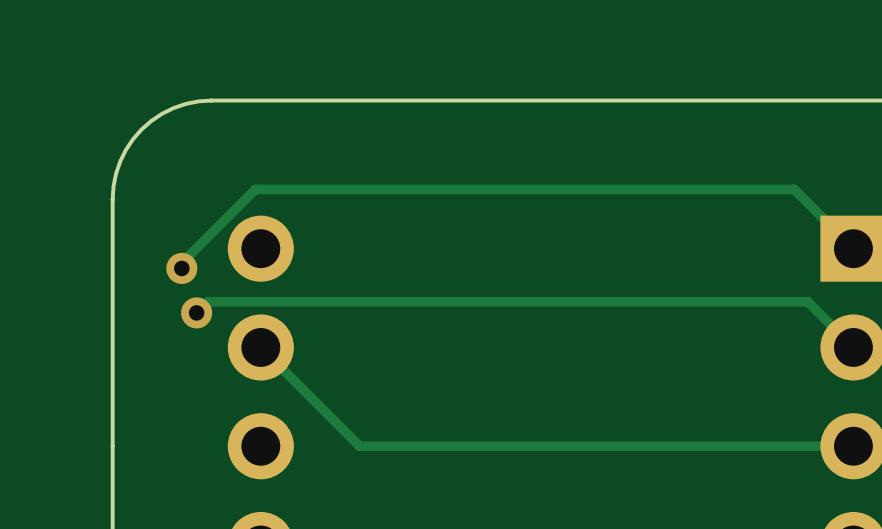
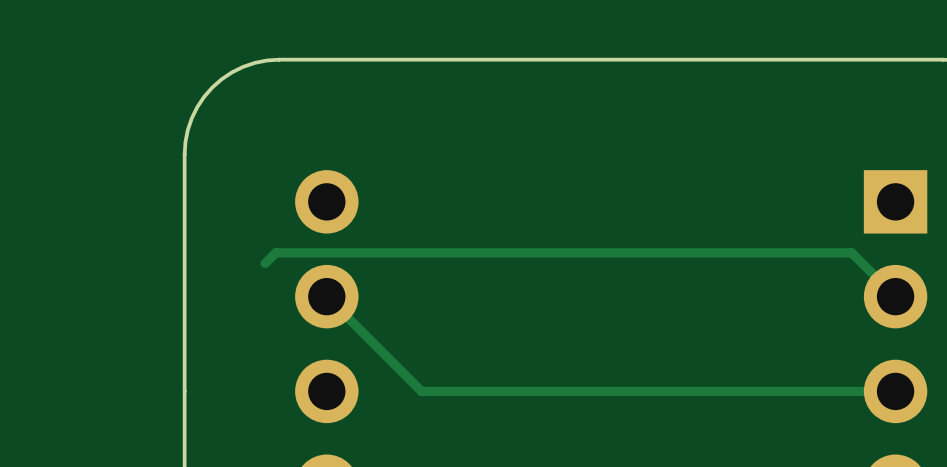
track: (853, 248) (794, 189) (255, 189) (181, 263) (181, 268) -> none
via: (181, 268) -> none
via: (196, 312) -> none

